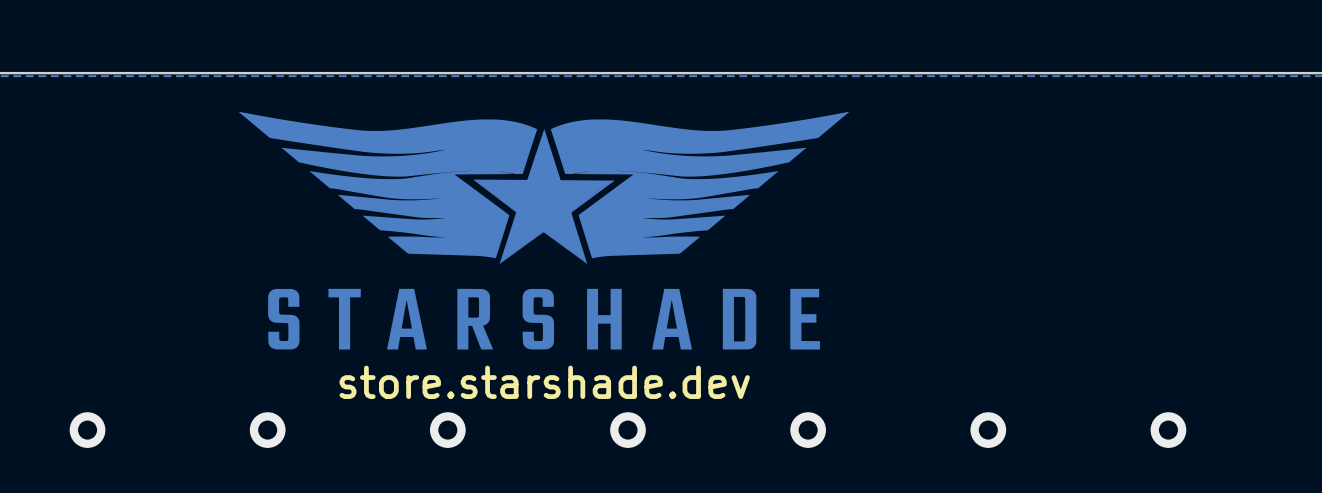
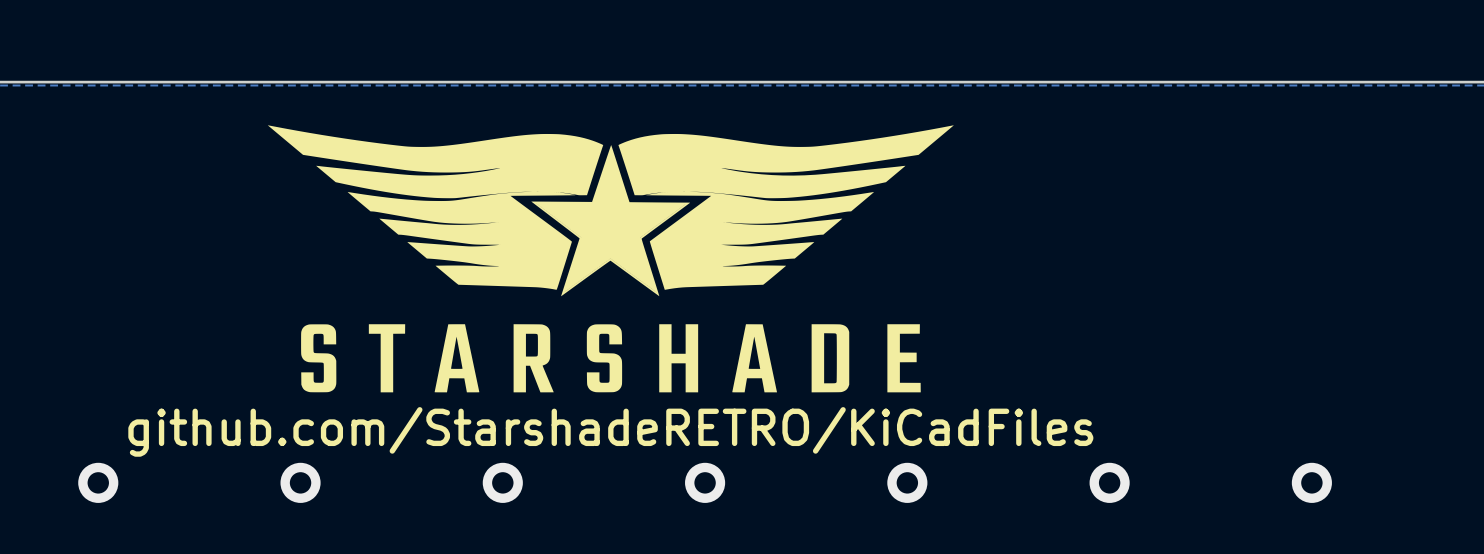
drawing shape: [238, 111, 850, 350] -> [267, 125, 954, 393]
text: store.starshade.dev (544, 382) -> github.com/StarshadeRETRO/KiCadFiles (610, 431)

